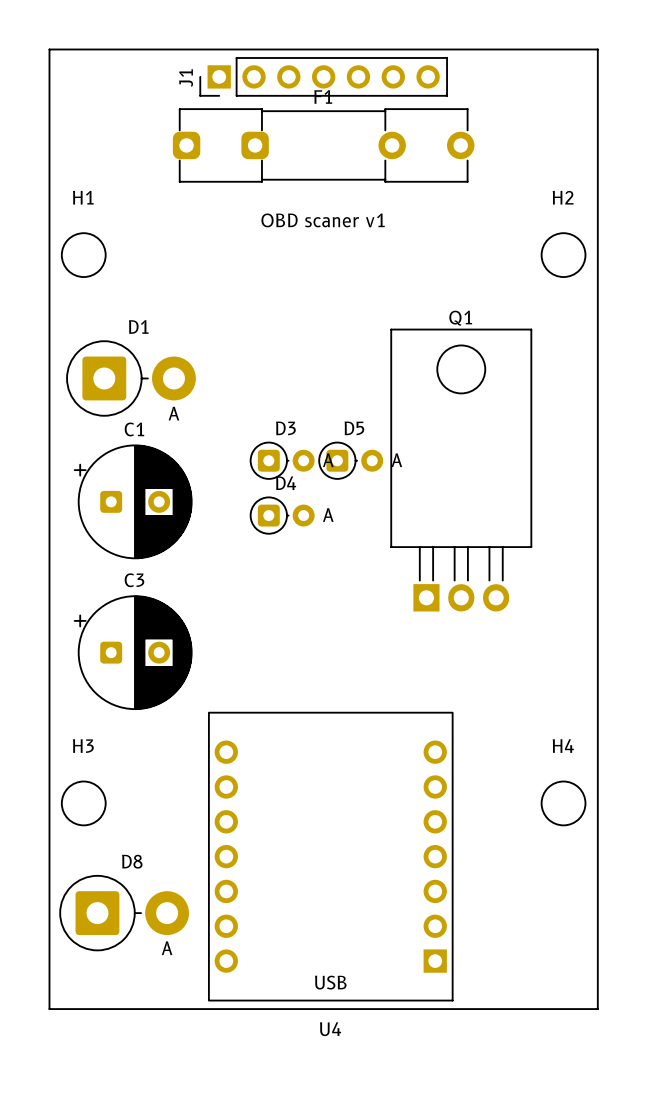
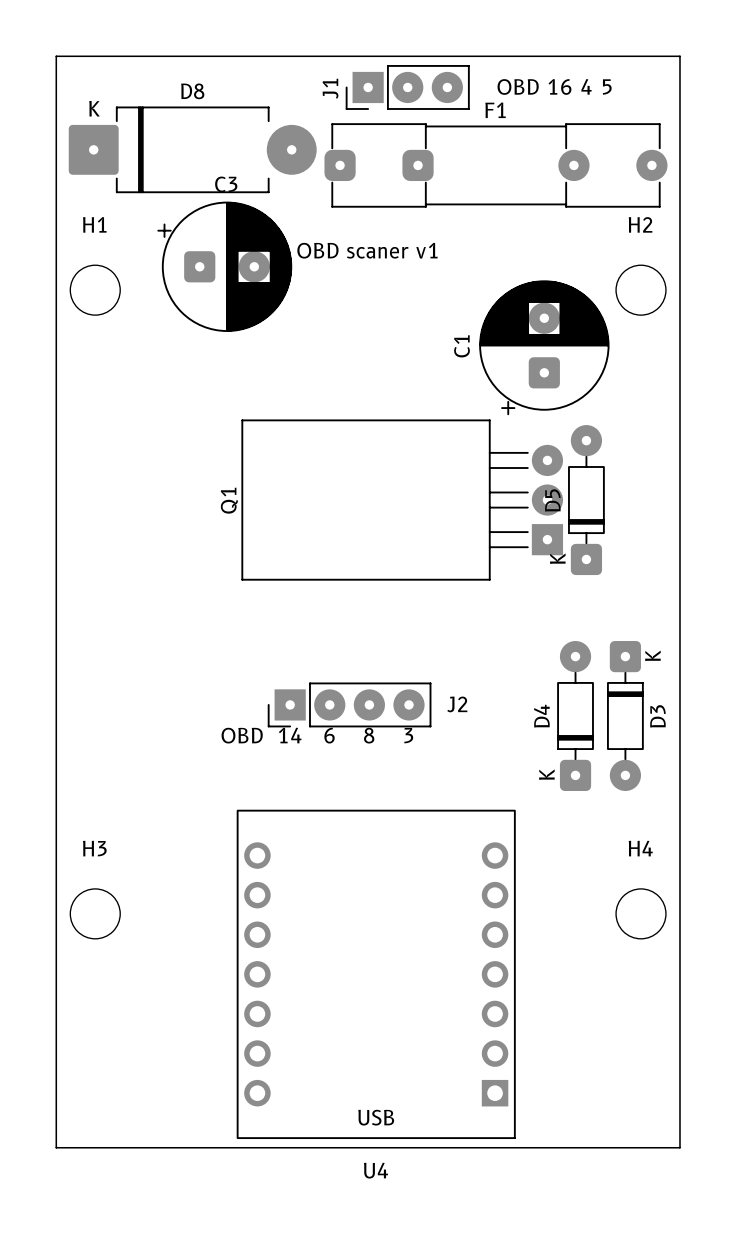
J1 footprint: [199, 57, 448, 97] -> [345, 65, 470, 110]
text: none -> OBD 16 4 5 (554, 86)
J1 name position: J1 (186, 78) -> J1 (330, 88)
F1 footprint: [172, 108, 475, 183] -> [324, 123, 668, 208]
Q1 name position: Q1 (460, 318) -> Q1 (229, 500)
Q1 footprint: [390, 328, 533, 612] -> [241, 419, 564, 581]
D1: (131, 378) -> none
D3 name position: D3 (285, 428) -> D3 (657, 716)
D5 name position: D5 (354, 428) -> D5 (552, 500)
C1 name position: C1 (134, 429) -> C1 (461, 346)
D3 footprint: [249, 441, 315, 480] -> [607, 641, 644, 792]
D5 footprint: [318, 441, 384, 480] -> [568, 425, 605, 576]
C1 footprint: [73, 444, 193, 560] -> [479, 280, 610, 416]
D4 name position: D4 (286, 483) -> D4 (541, 716)
D4 footprint: [249, 496, 315, 535] -> [557, 641, 594, 792]
C3 footprint: [73, 595, 193, 710] -> [157, 201, 293, 332]
J2: none -> (349, 704)
text: none -> OBD (242, 735)
text: none -> 14 (290, 735)
text: none -> 6 (329, 735)
text: none -> 8 (369, 735)
text: none -> 3 (408, 735)
D8 footprint: [59, 874, 190, 952] -> [68, 106, 317, 194]

